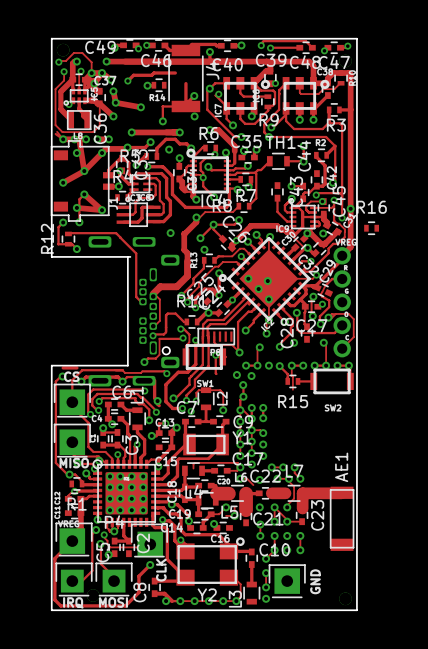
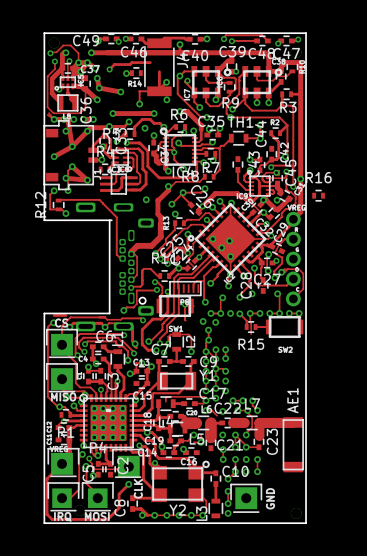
track: none -> (201, 232) (193, 243) (193, 253) (189, 257)
track: none -> (189, 257) (188, 261) (193, 266)
track: none -> (204, 281) (196, 281) (193, 284) (193, 288)
track: (214, 336) (214, 342) (217, 345) (232, 345) (239, 352) -> none

